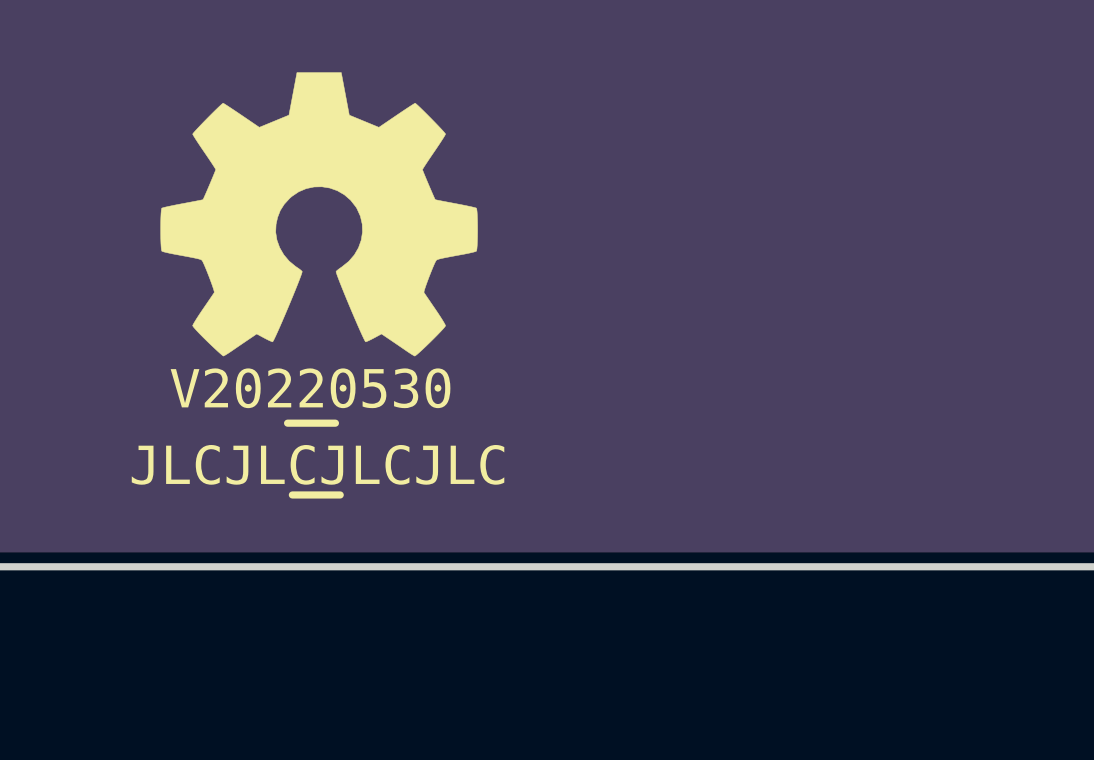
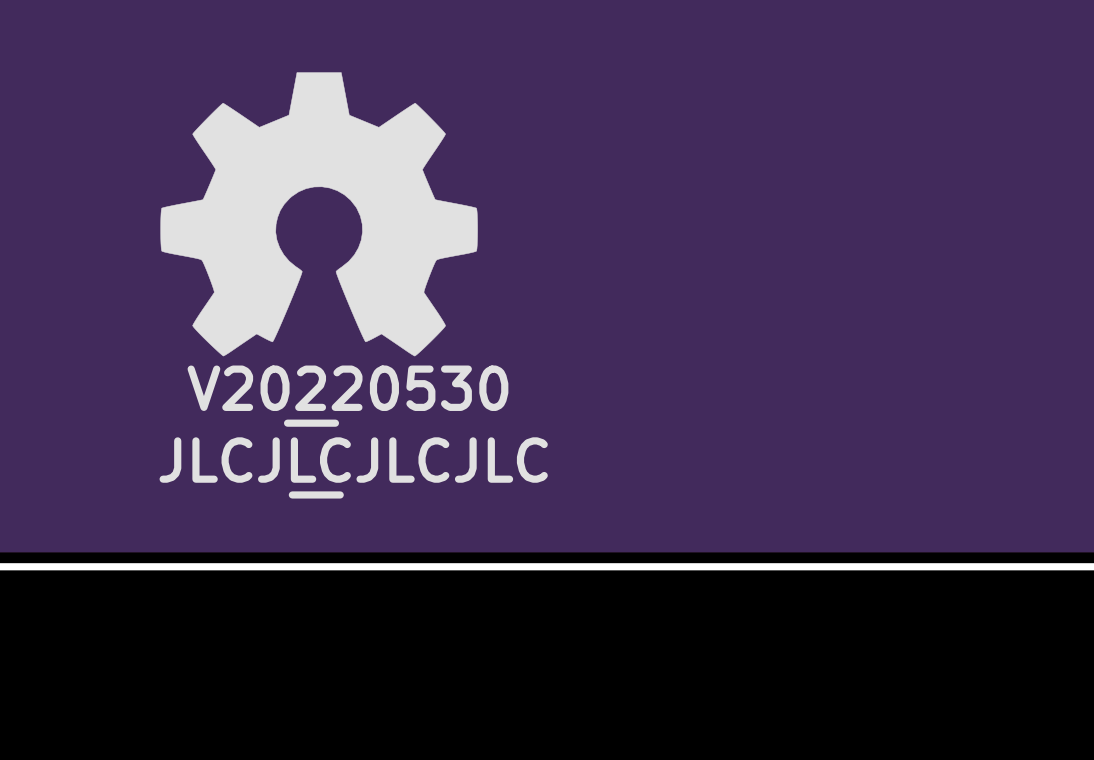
drawing shape: [170, 368, 451, 427] -> [187, 365, 509, 427]
drawing shape: [131, 444, 505, 499] -> [159, 437, 548, 499]

